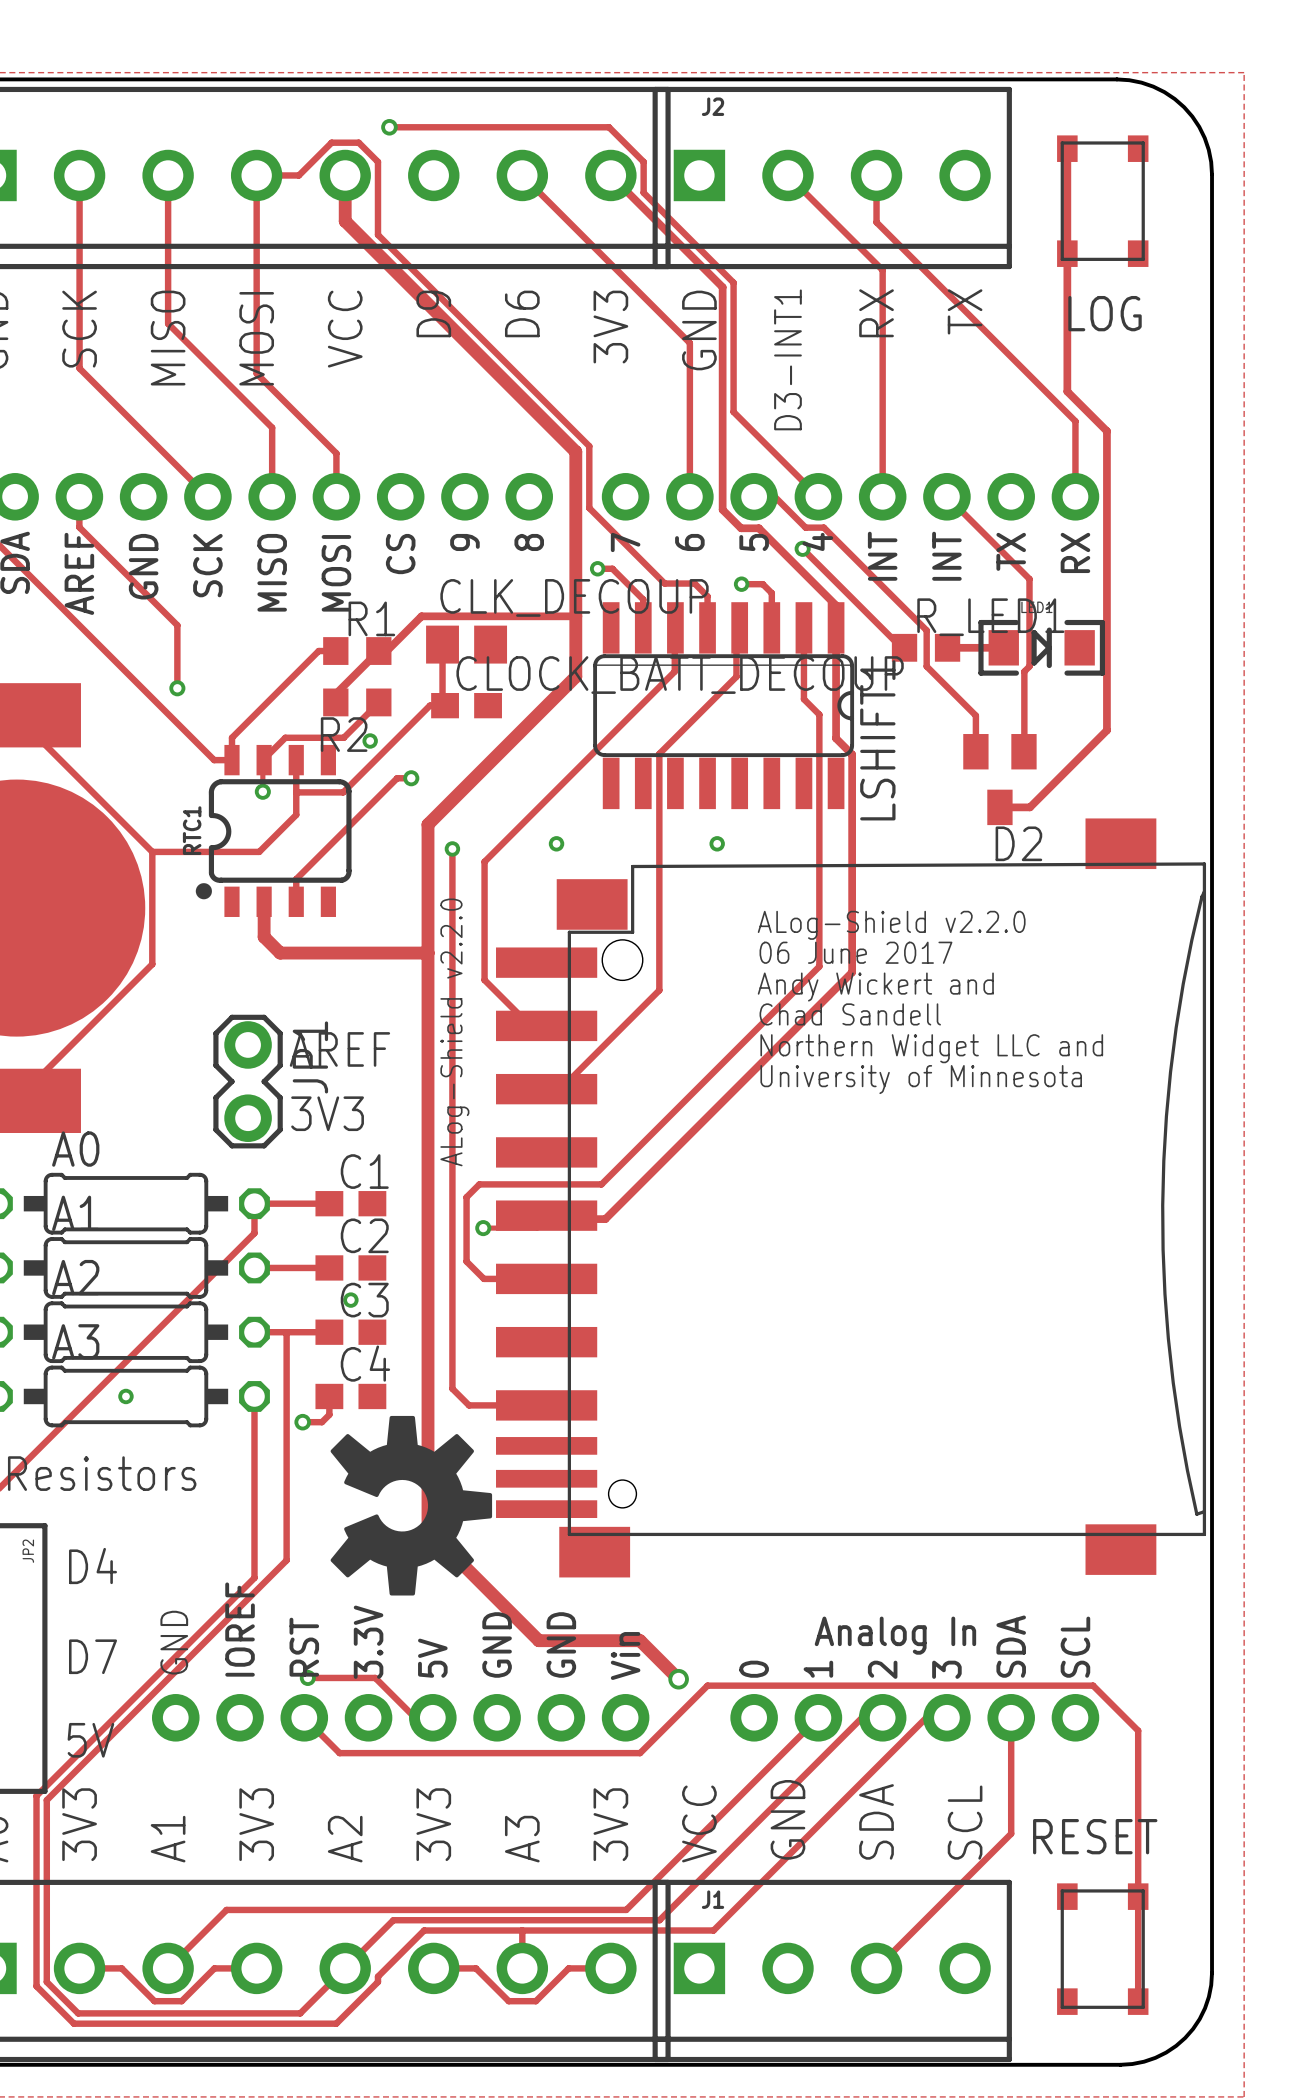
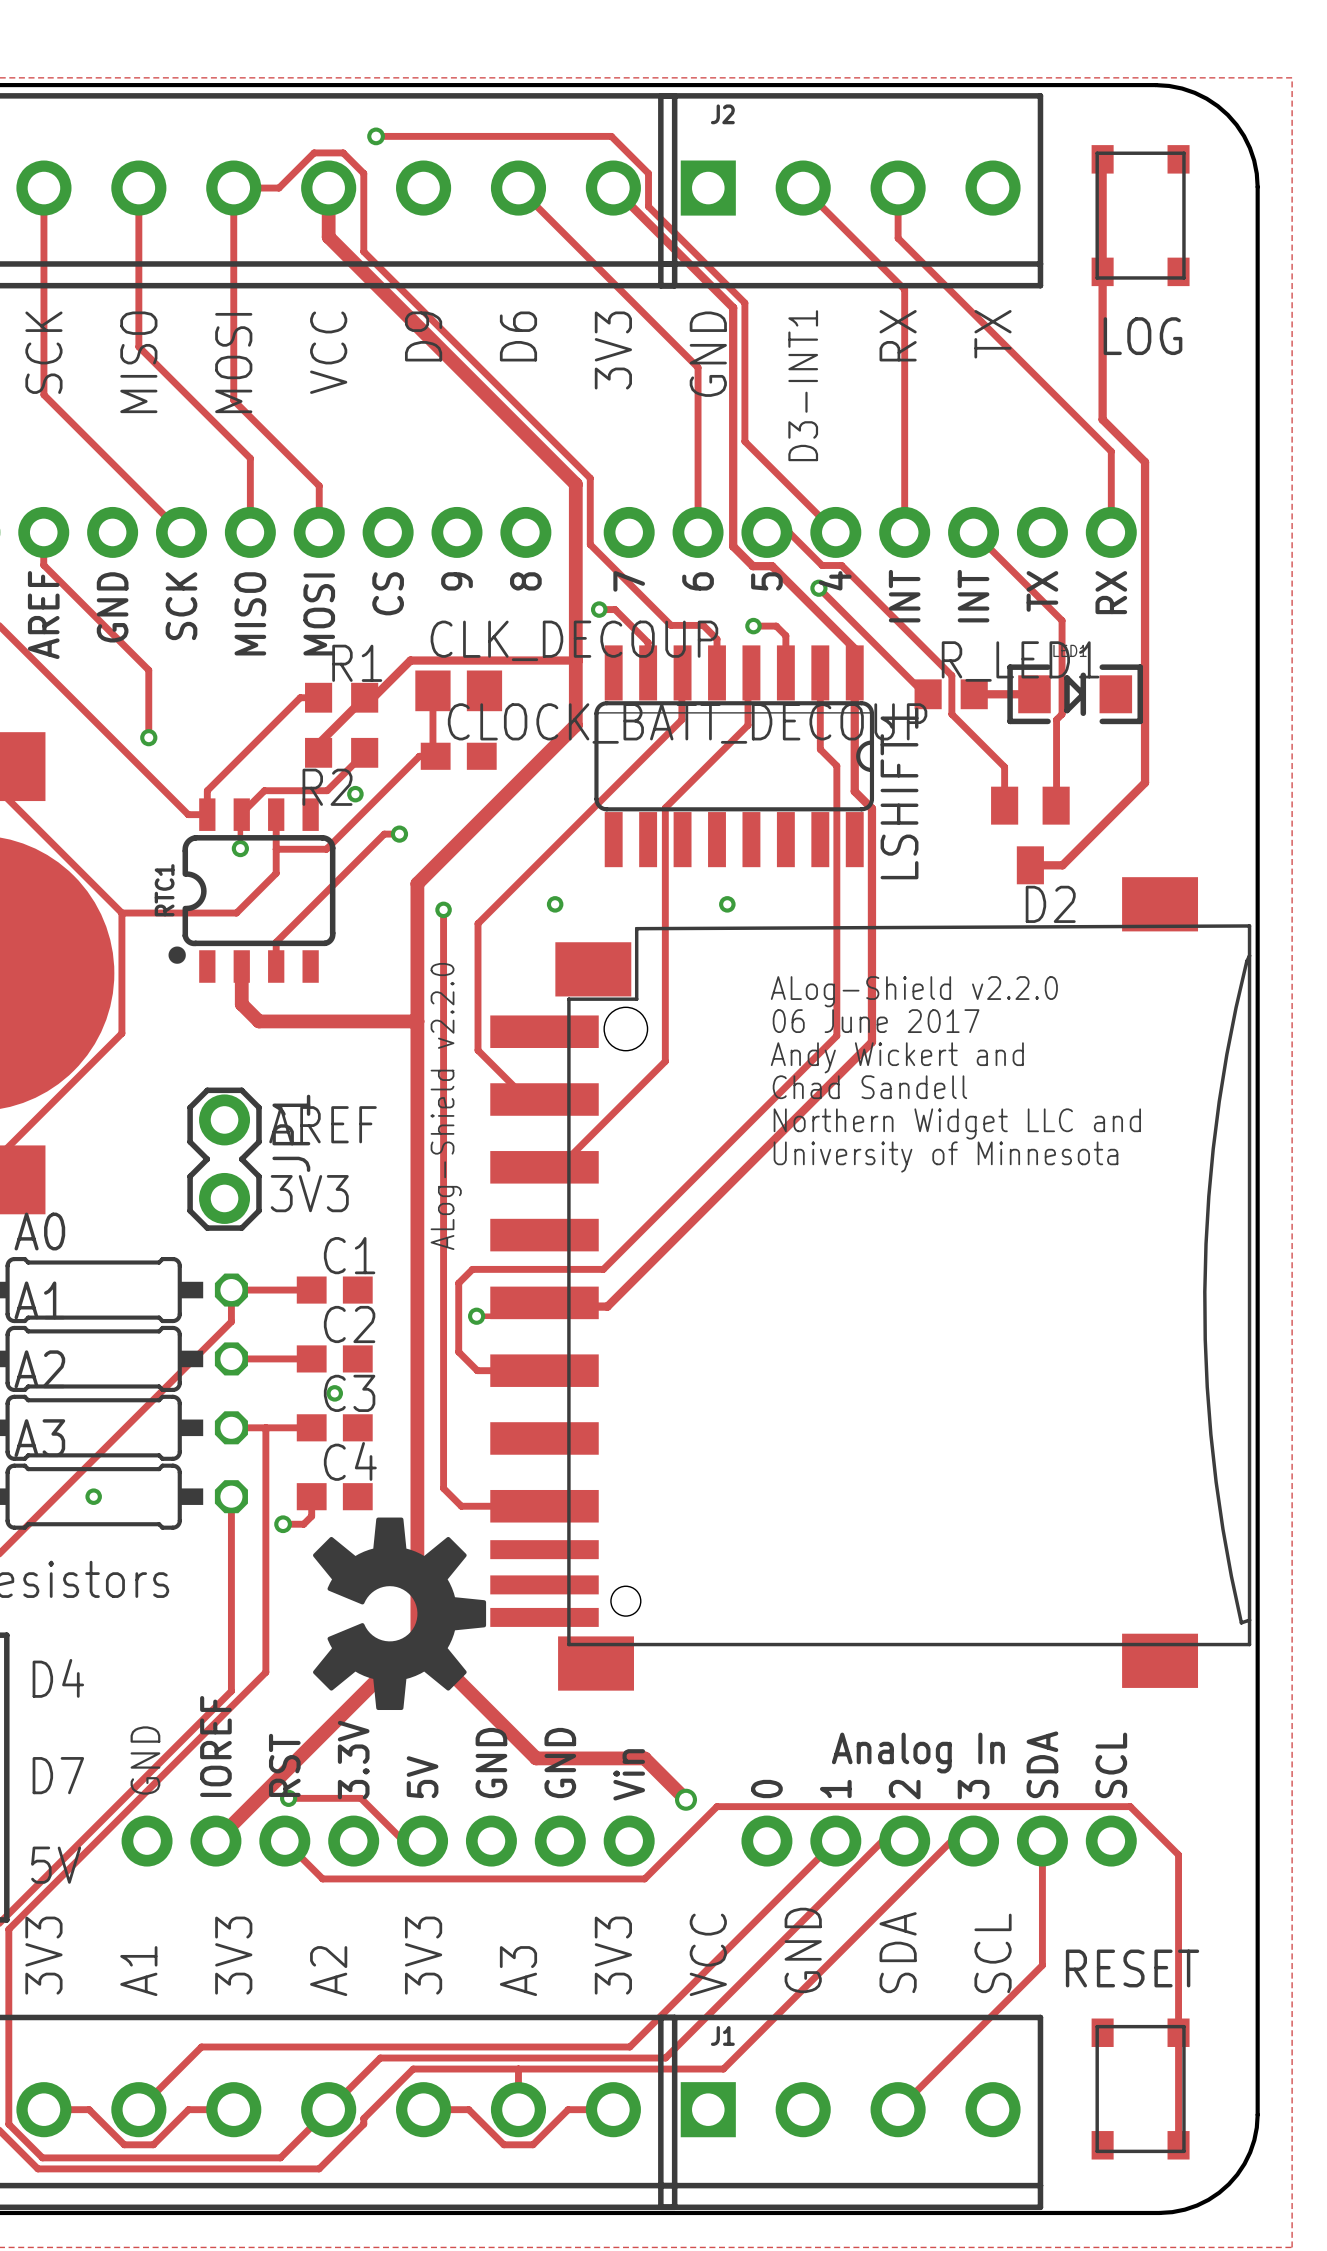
track: none -> (417, 1639) (215, 1841)

